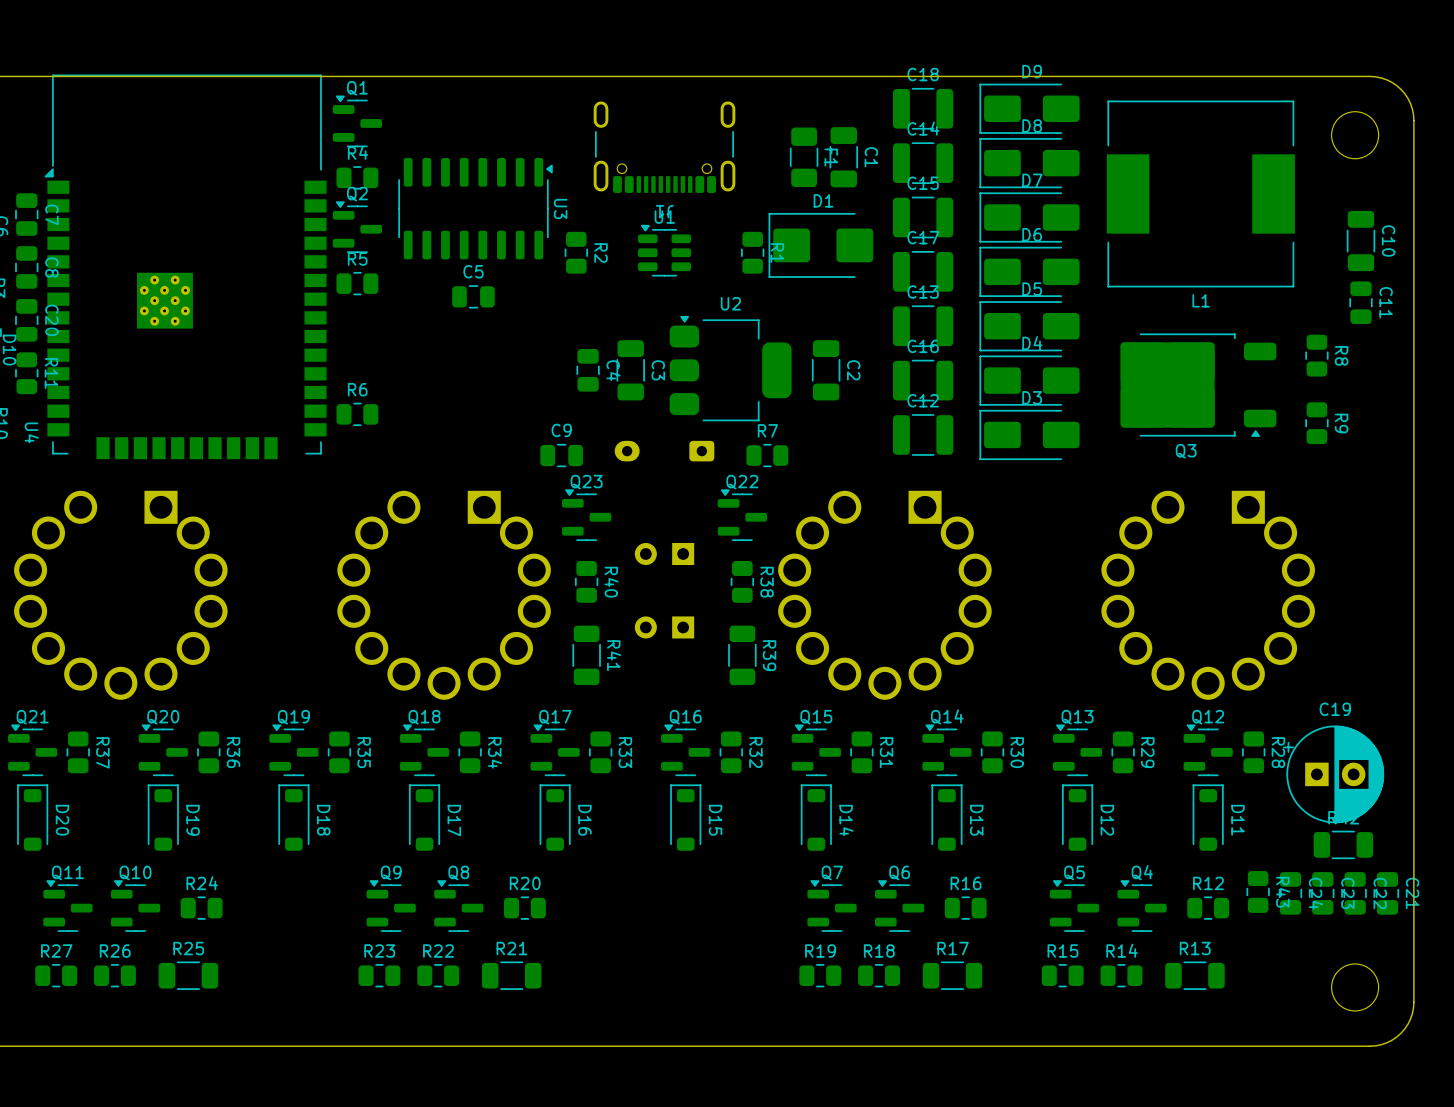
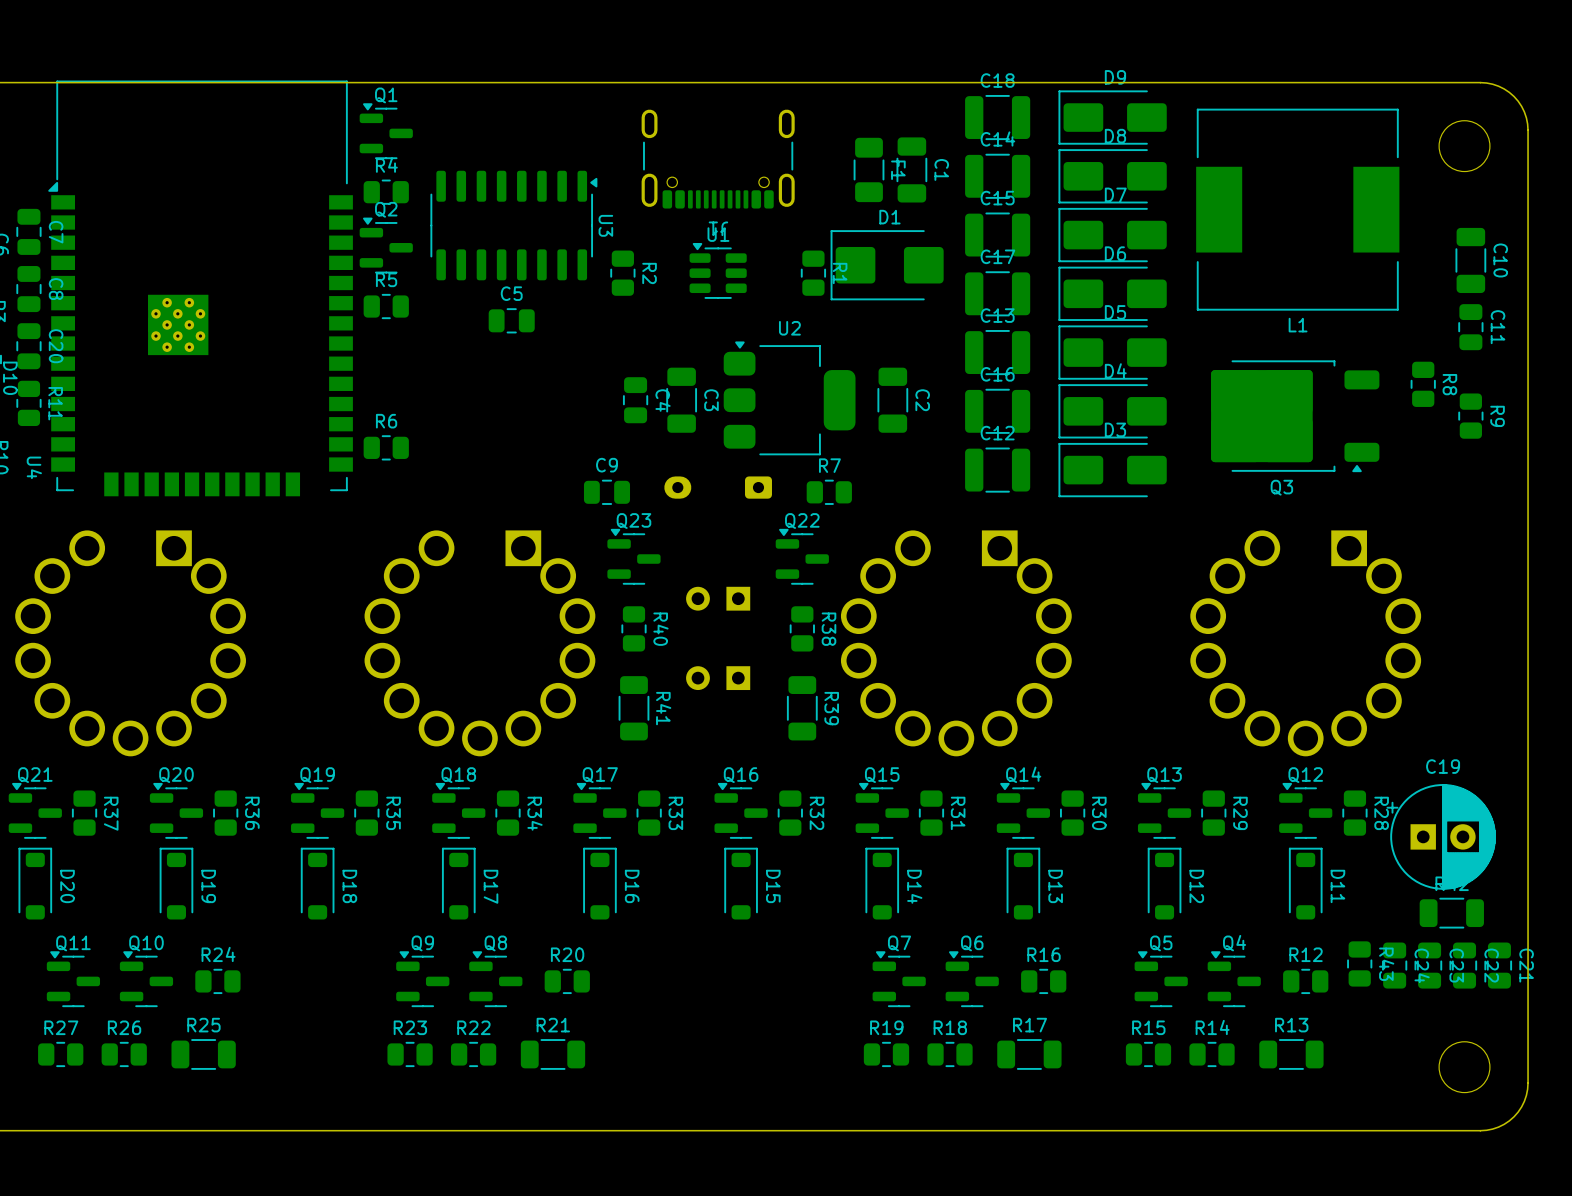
R9 position: (1316, 423) -> (1470, 416)

